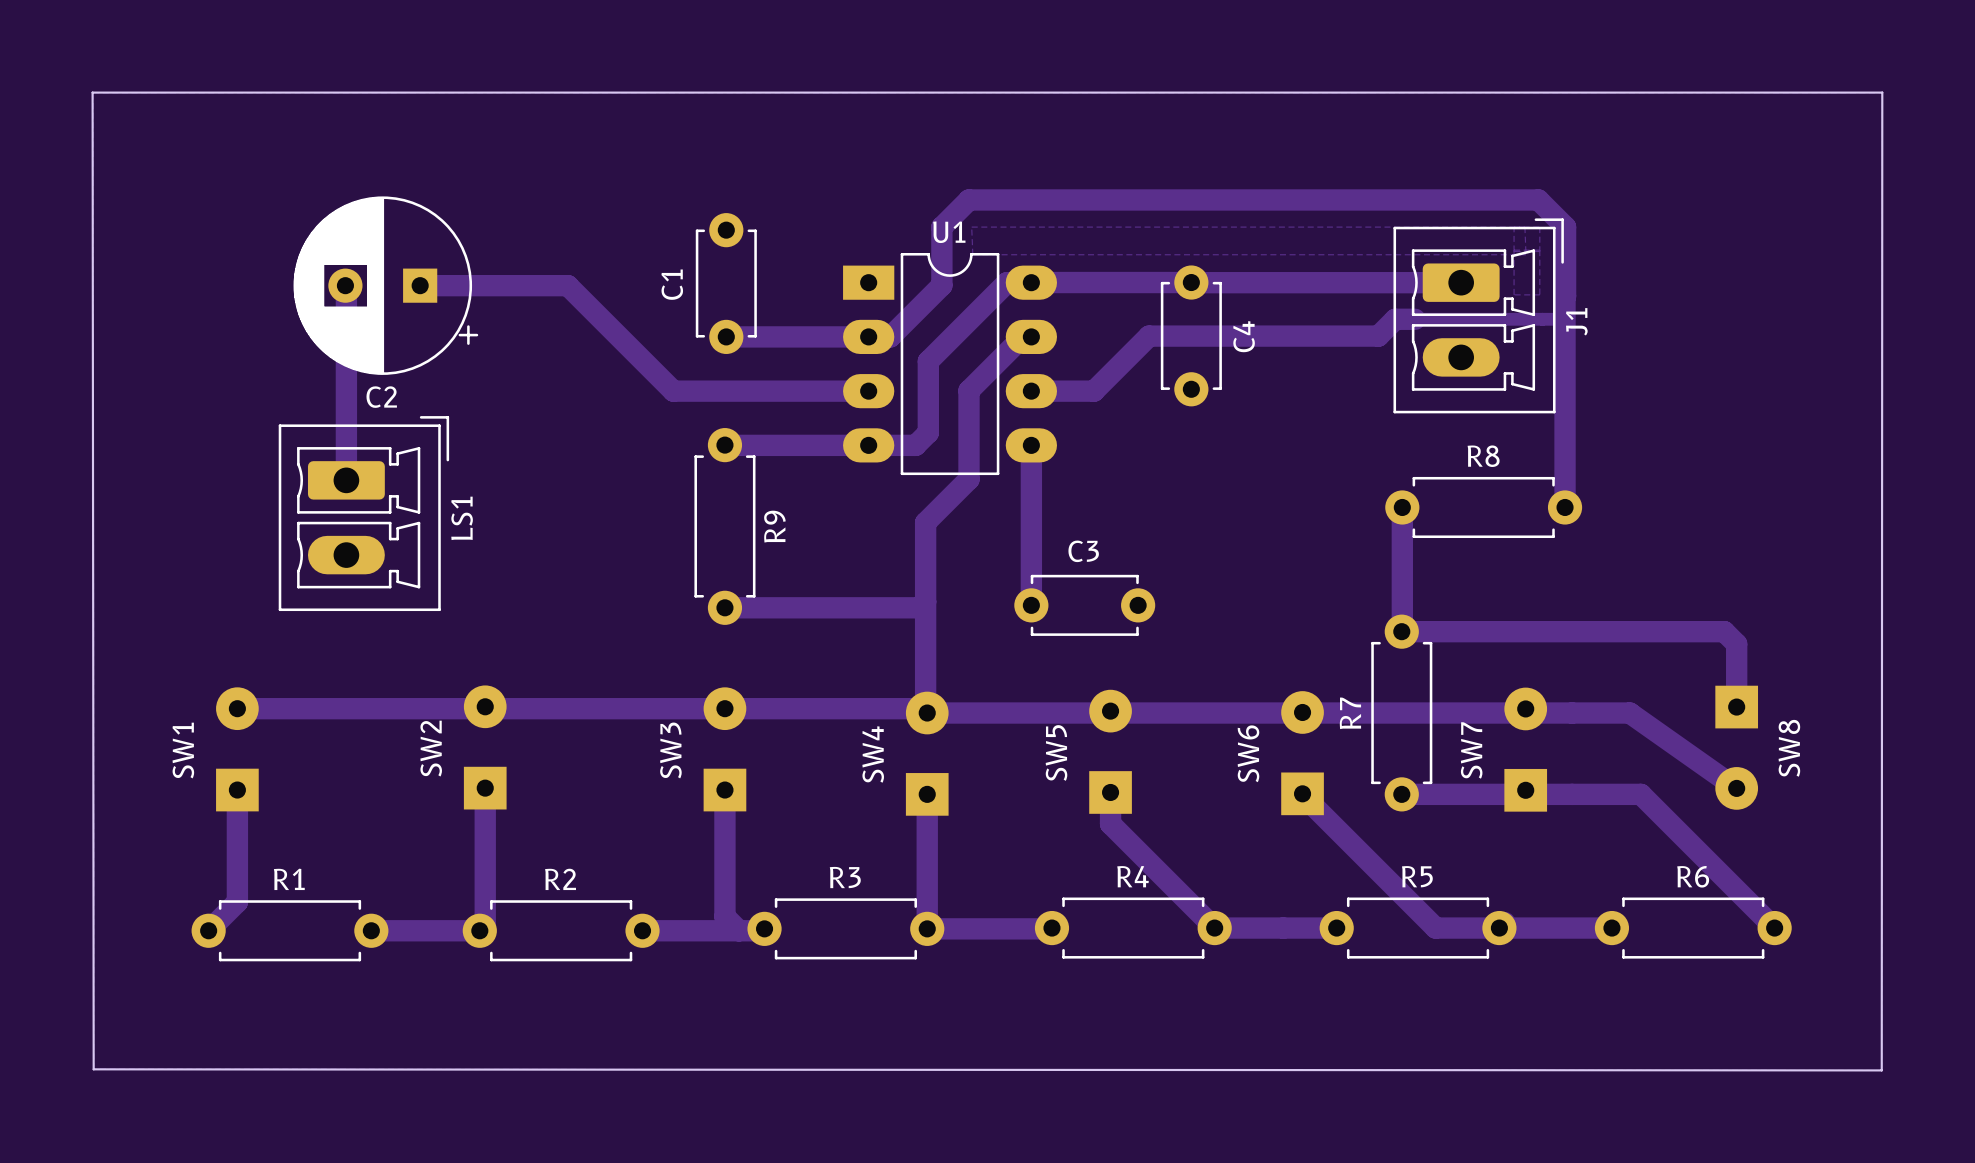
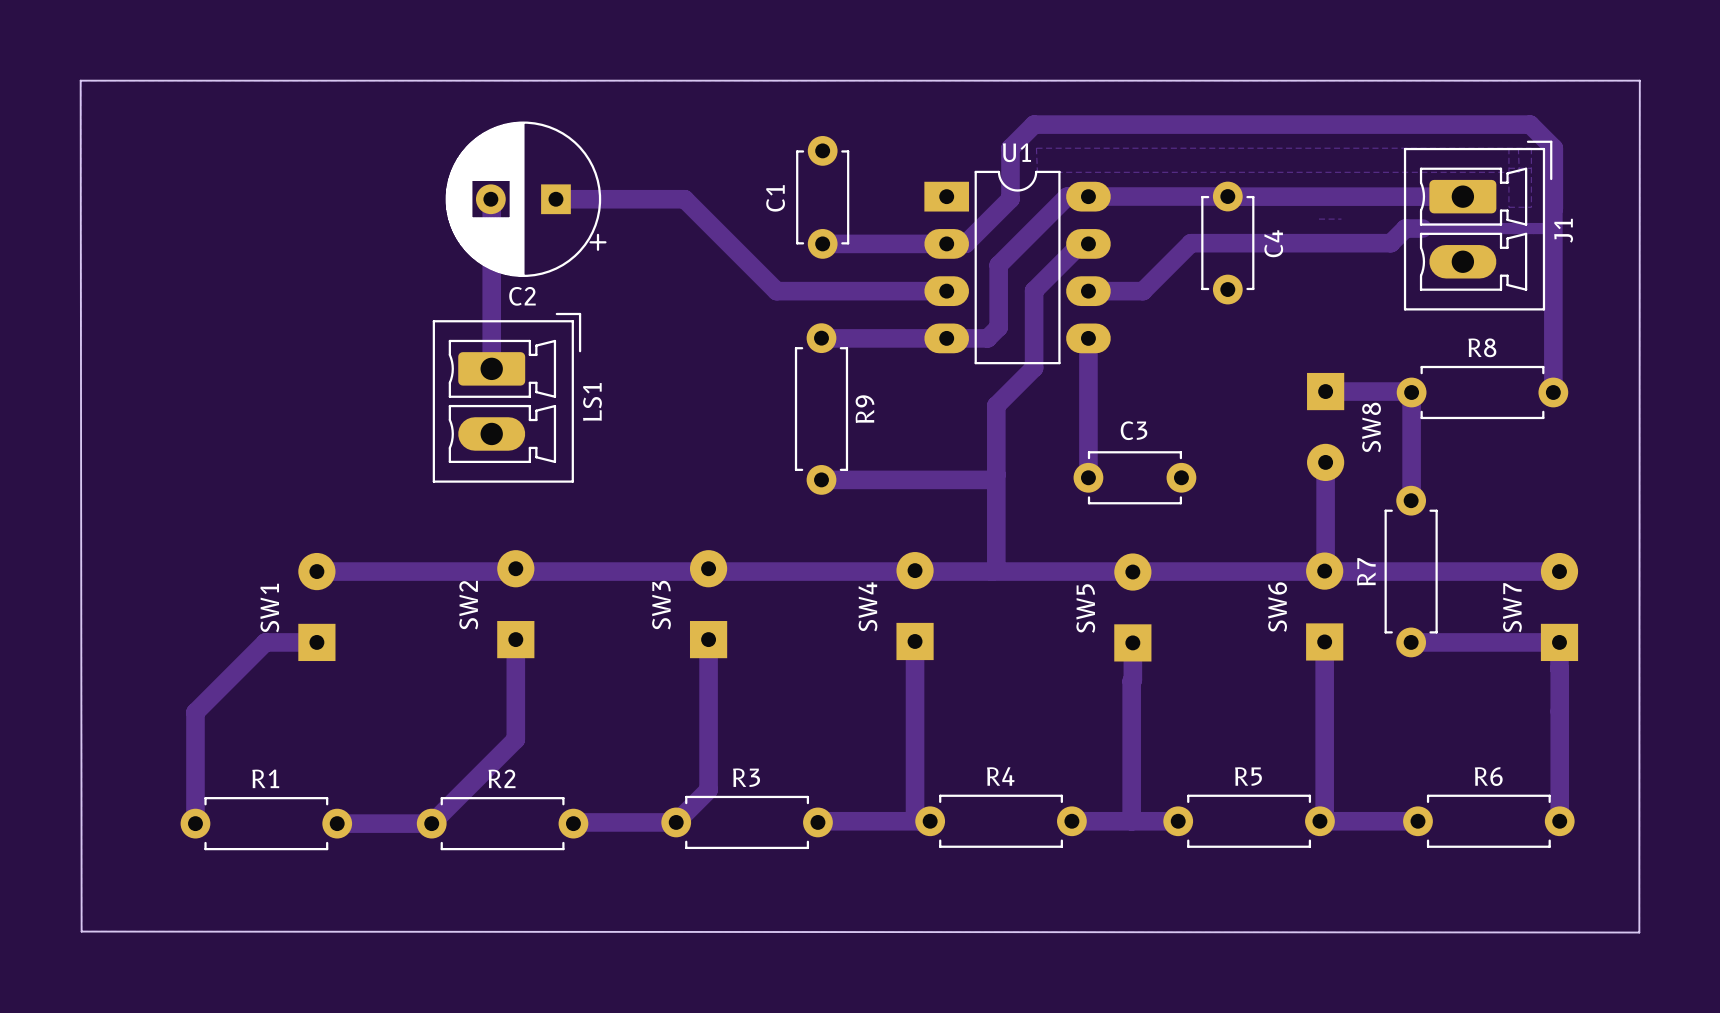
zone outline: (1514, 227) (1514, 294) (1539, 294) (1539, 227) (971, 227) (972, 254) (1525, 254) (1524, 227) -> (1508, 148) (1508, 207) (1531, 207) (1531, 148) (1036, 148) (1037, 172) (1519, 172) (1518, 148)
zone outline: (1514, 250) (1539, 250) -> (1508, 168) (1531, 168)
track: none -> (1088, 243) (1081, 243) (1034, 290) (1034, 367) (996, 405) (996, 567) (992, 571)
track: (1030, 282) (1191, 282) -> (1087, 196) (1227, 196)
track: (1031, 282) (1006, 282) (928, 361) (928, 432) (915, 445) (868, 445) -> (1088, 196) (1067, 196) (998, 265) (998, 327) (987, 338) (946, 338)
track: (1191, 282) (1461, 282) -> (1227, 196) (1462, 196)
C1 position: (726, 283) -> (822, 197)
track: (345, 285) (346, 480) -> (490, 199) (491, 368)
C2 position: (385, 285) -> (526, 199)
track: (420, 285) (567, 285) (673, 391) (868, 391) -> (555, 199) (684, 199) (776, 291) (946, 291)
J1 position: (1478, 315) -> (1478, 225)
track: (1565, 319) (1395, 319) (1378, 336) (1149, 336) (1094, 391) (1031, 391) -> (1553, 228) (1405, 228) (1390, 243) (1190, 243) (1143, 291) (1088, 291)
C4 position: (1191, 335) -> (1227, 243)
track: (726, 336) (867, 336) -> (822, 243) (945, 243)
track: (868, 336) (890, 336) (941, 285) (941, 227) (969, 199) (1538, 199) (1565, 227) (1565, 507) -> (946, 243) (965, 243) (1010, 199) (1010, 148) (1034, 124) (1530, 124) (1553, 148) (1553, 392)
track: (1031, 336) (1022, 336) (969, 390) (969, 479) (925, 522) (925, 708) -> none
U1 position: (950, 364) -> (1017, 267)
track: (726, 445) (867, 445) -> (822, 338) (945, 338)
track: (1031, 445) (1031, 605) -> (1088, 338) (1088, 477)
track: none -> (1410, 391) (1411, 500)
track: none -> (1325, 391) (1410, 391)
track: (1400, 505) (1402, 507) (1401, 631) (1724, 631) (1736, 644) (1736, 707) -> none
R8 position: (1483, 507) -> (1482, 392)
LS1 position: (363, 513) -> (506, 397)
R9 position: (724, 526) -> (821, 409)
track: none -> (1325, 462) (1325, 571)
track: (925, 601) (919, 607) (724, 607) -> (996, 474) (991, 479) (821, 479)
C3 position: (1084, 605) -> (1134, 477)
track: none -> (1559, 571) (321, 571) (316, 575)
track: (237, 708) (922, 708) (927, 713) -> none
track: (925, 713) (1629, 713) (1736, 788) -> none
R7 position: (1401, 713) -> (1411, 571)
track: none -> (515, 639) (515, 739) (431, 823) (337, 823)
track: none -> (708, 639) (708, 790) (676, 822) (573, 823)
track: none -> (915, 641) (915, 816) (920, 821)
track: none -> (1324, 641) (1324, 816) (1319, 821) (1417, 821)
track: none -> (316, 642) (265, 642) (195, 712) (195, 823)
track: none -> (1132, 642) (1131, 821)
track: none -> (1412, 642) (1559, 642) (1559, 668)
SW2 position: (485, 747) -> (515, 604)
SW8 position: (1736, 747) -> (1325, 426)
SW1 position: (237, 749) -> (316, 606)
SW3 position: (724, 749) -> (708, 604)
SW7 position: (1525, 749) -> (1559, 606)
SW5 position: (1110, 751) -> (1132, 607)
SW4 position: (927, 753) -> (915, 606)
SW6 position: (1302, 753) -> (1324, 606)
track: none -> (1559, 668) (1559, 821)
track: (485, 788) (485, 925) (479, 930) (371, 930) -> none
track: (237, 790) (237, 902) (208, 930) -> none
track: (724, 790) (724, 916) (739, 930) -> none
track: (1110, 792) (1110, 823) (1214, 928) (1336, 928) -> none
track: (1302, 793) (1435, 928) (1611, 928) -> none
track: (927, 794) (927, 928) (1051, 928) -> none
track: (1403, 794) (1640, 794) (1774, 928) -> none
track: (764, 928) (762, 930) (642, 930) (643, 929) -> none
R3 position: (845, 928) -> (747, 822)
R4 position: (1133, 928) -> (1001, 821)
R5 position: (1418, 928) -> (1249, 821)
R6 position: (1693, 928) -> (1488, 821)
R1 position: (290, 930) -> (266, 823)
R2 position: (561, 930) -> (502, 823)
track: none -> (930, 821) (817, 822)
track: none -> (1071, 821) (1178, 821)

